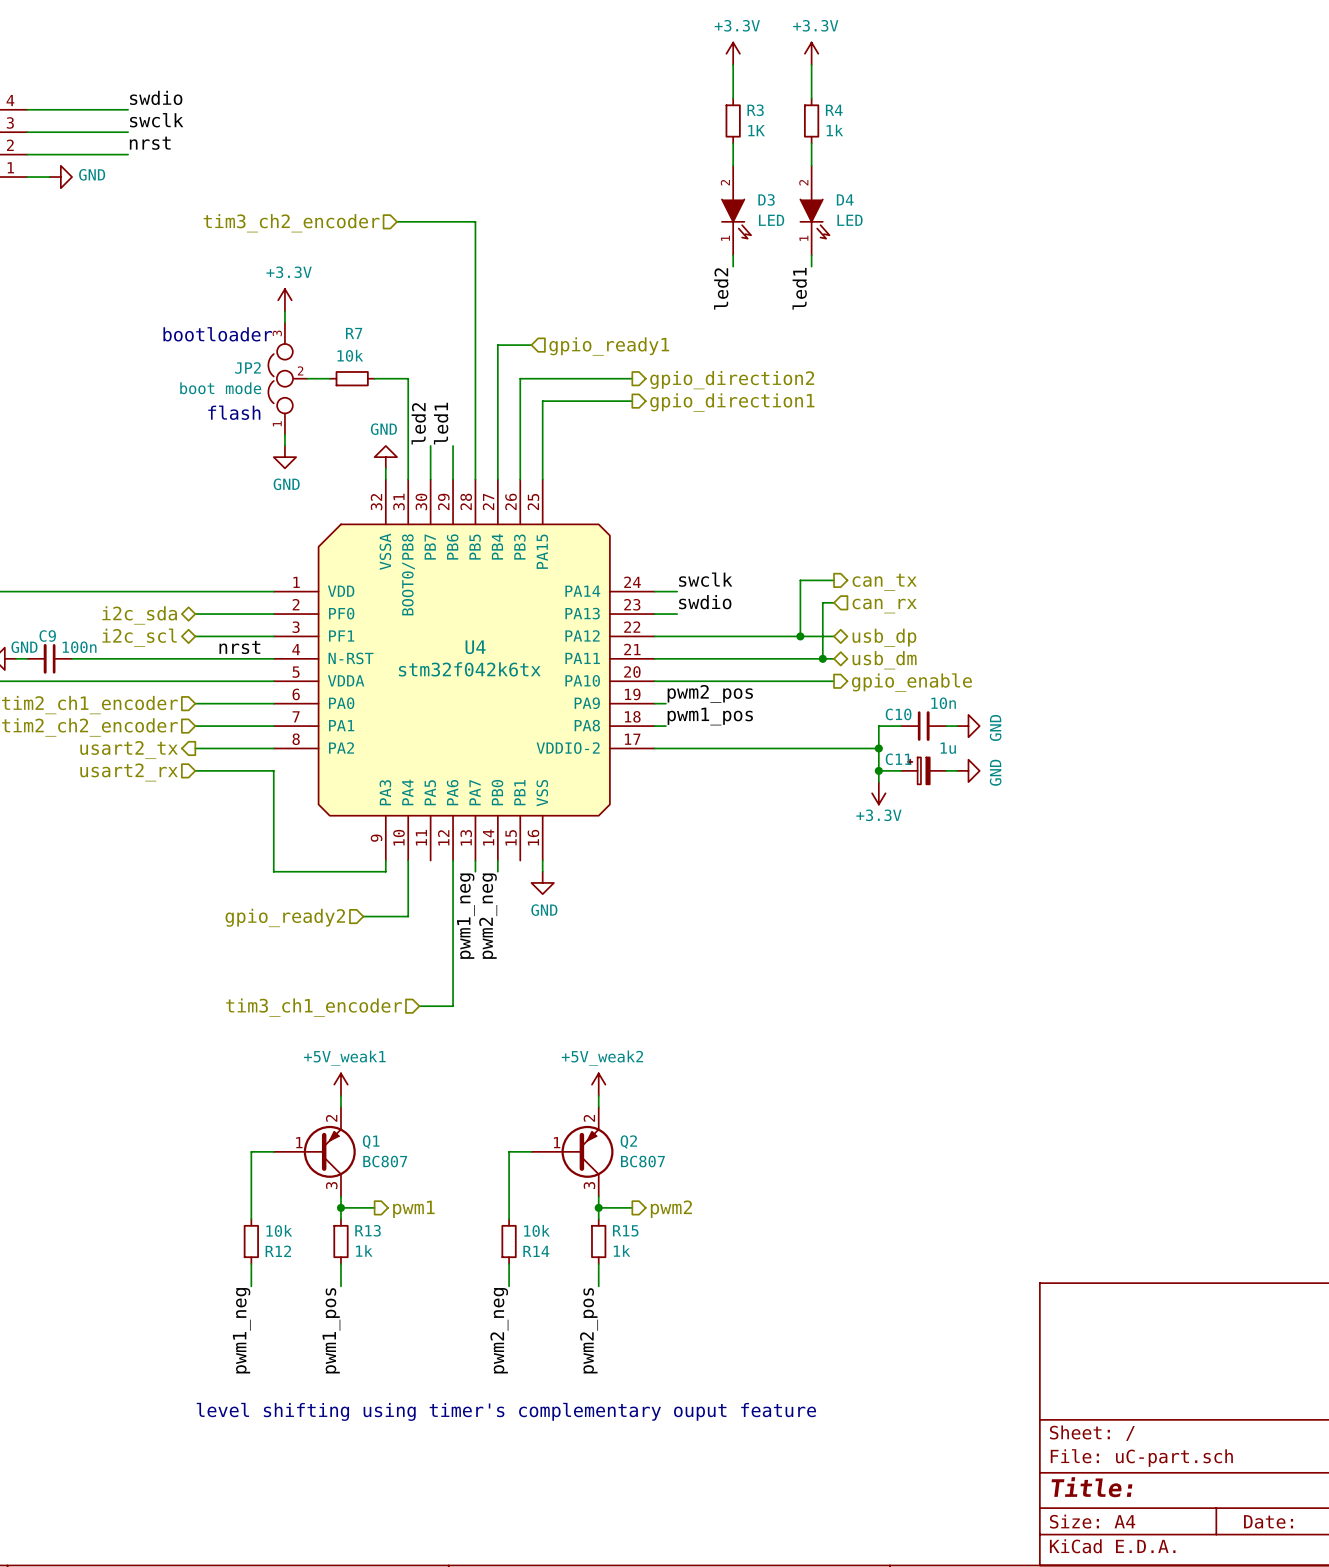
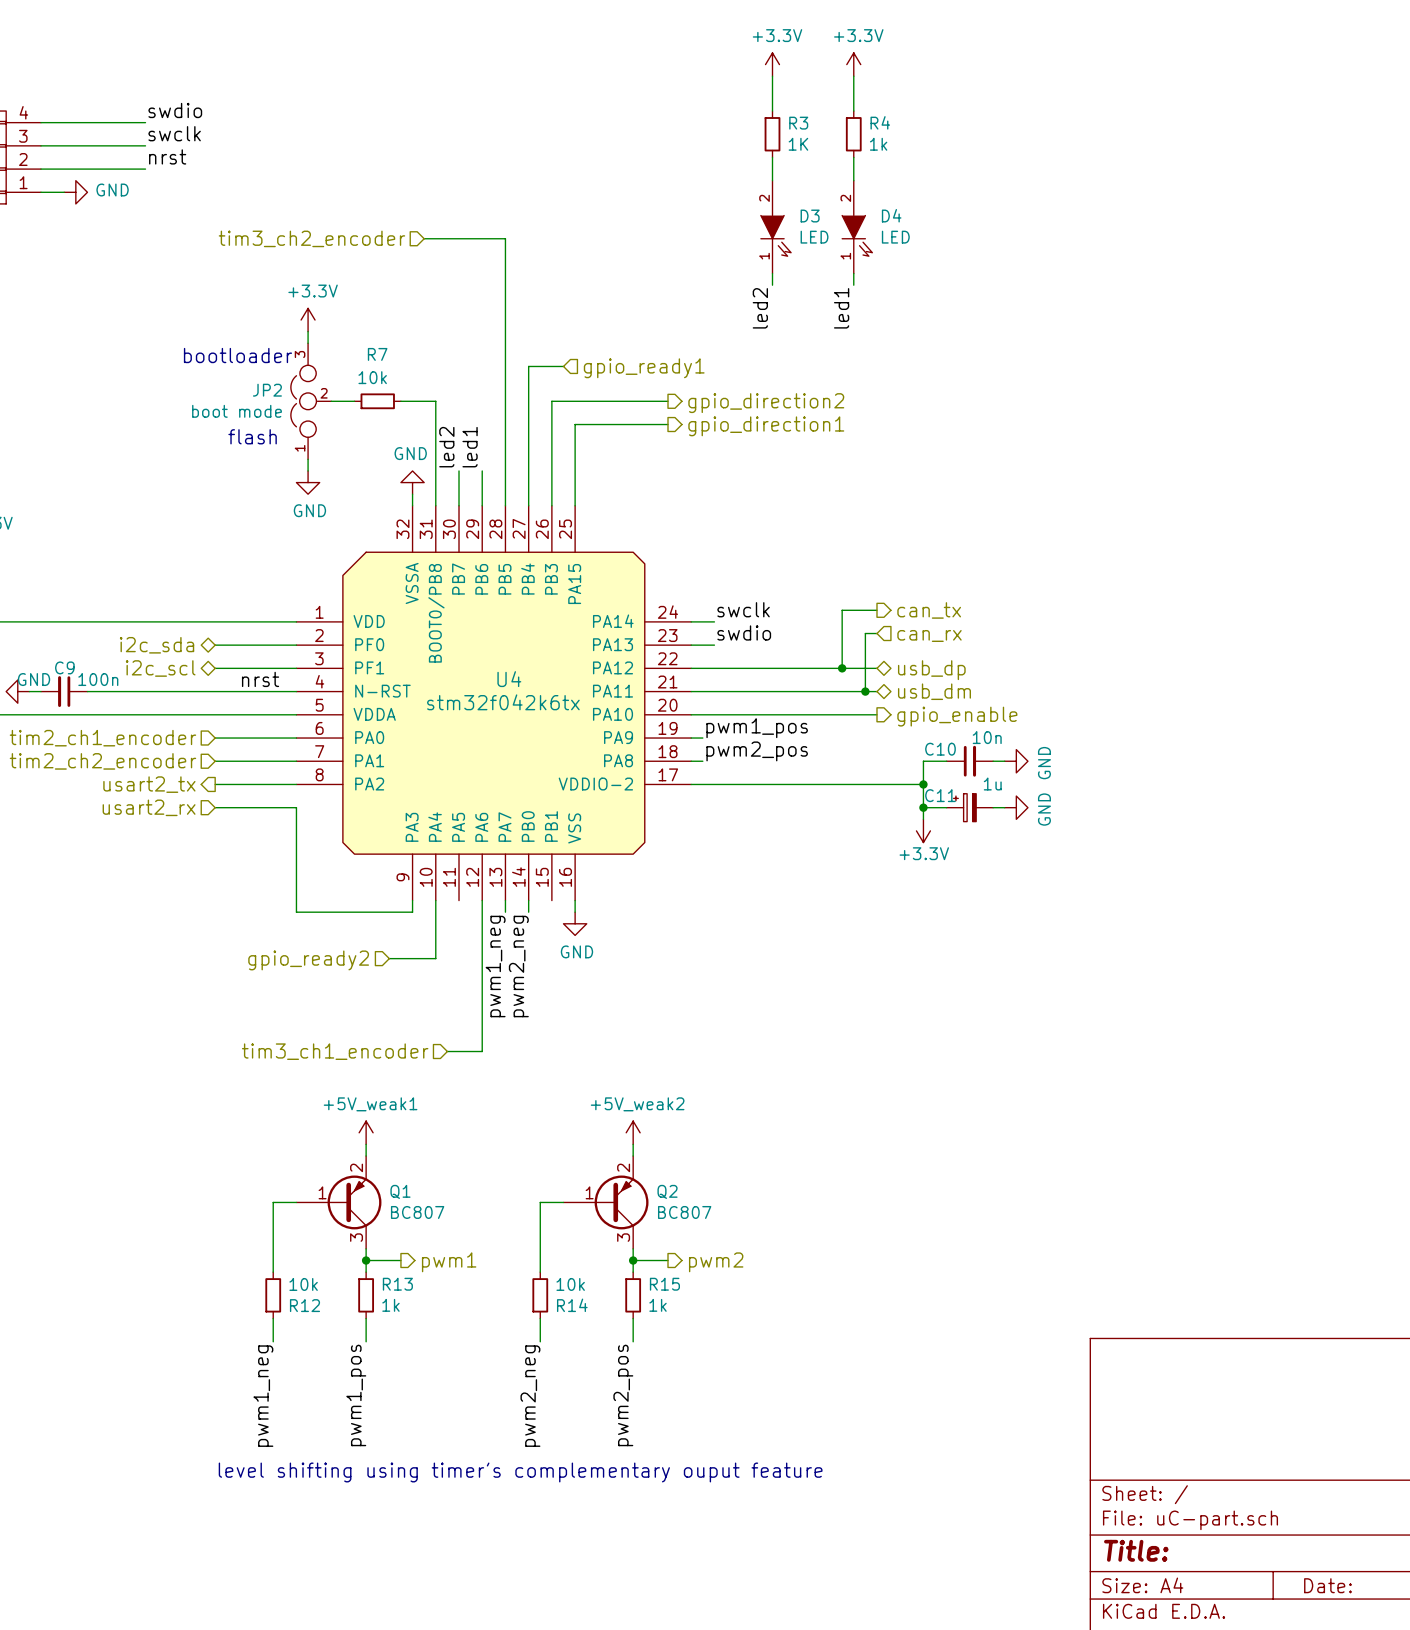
label: pwm2_pos (710, 693) -> pwm1_pos (757, 728)
label: pwm1_pos (710, 716) -> pwm2_pos (757, 751)

